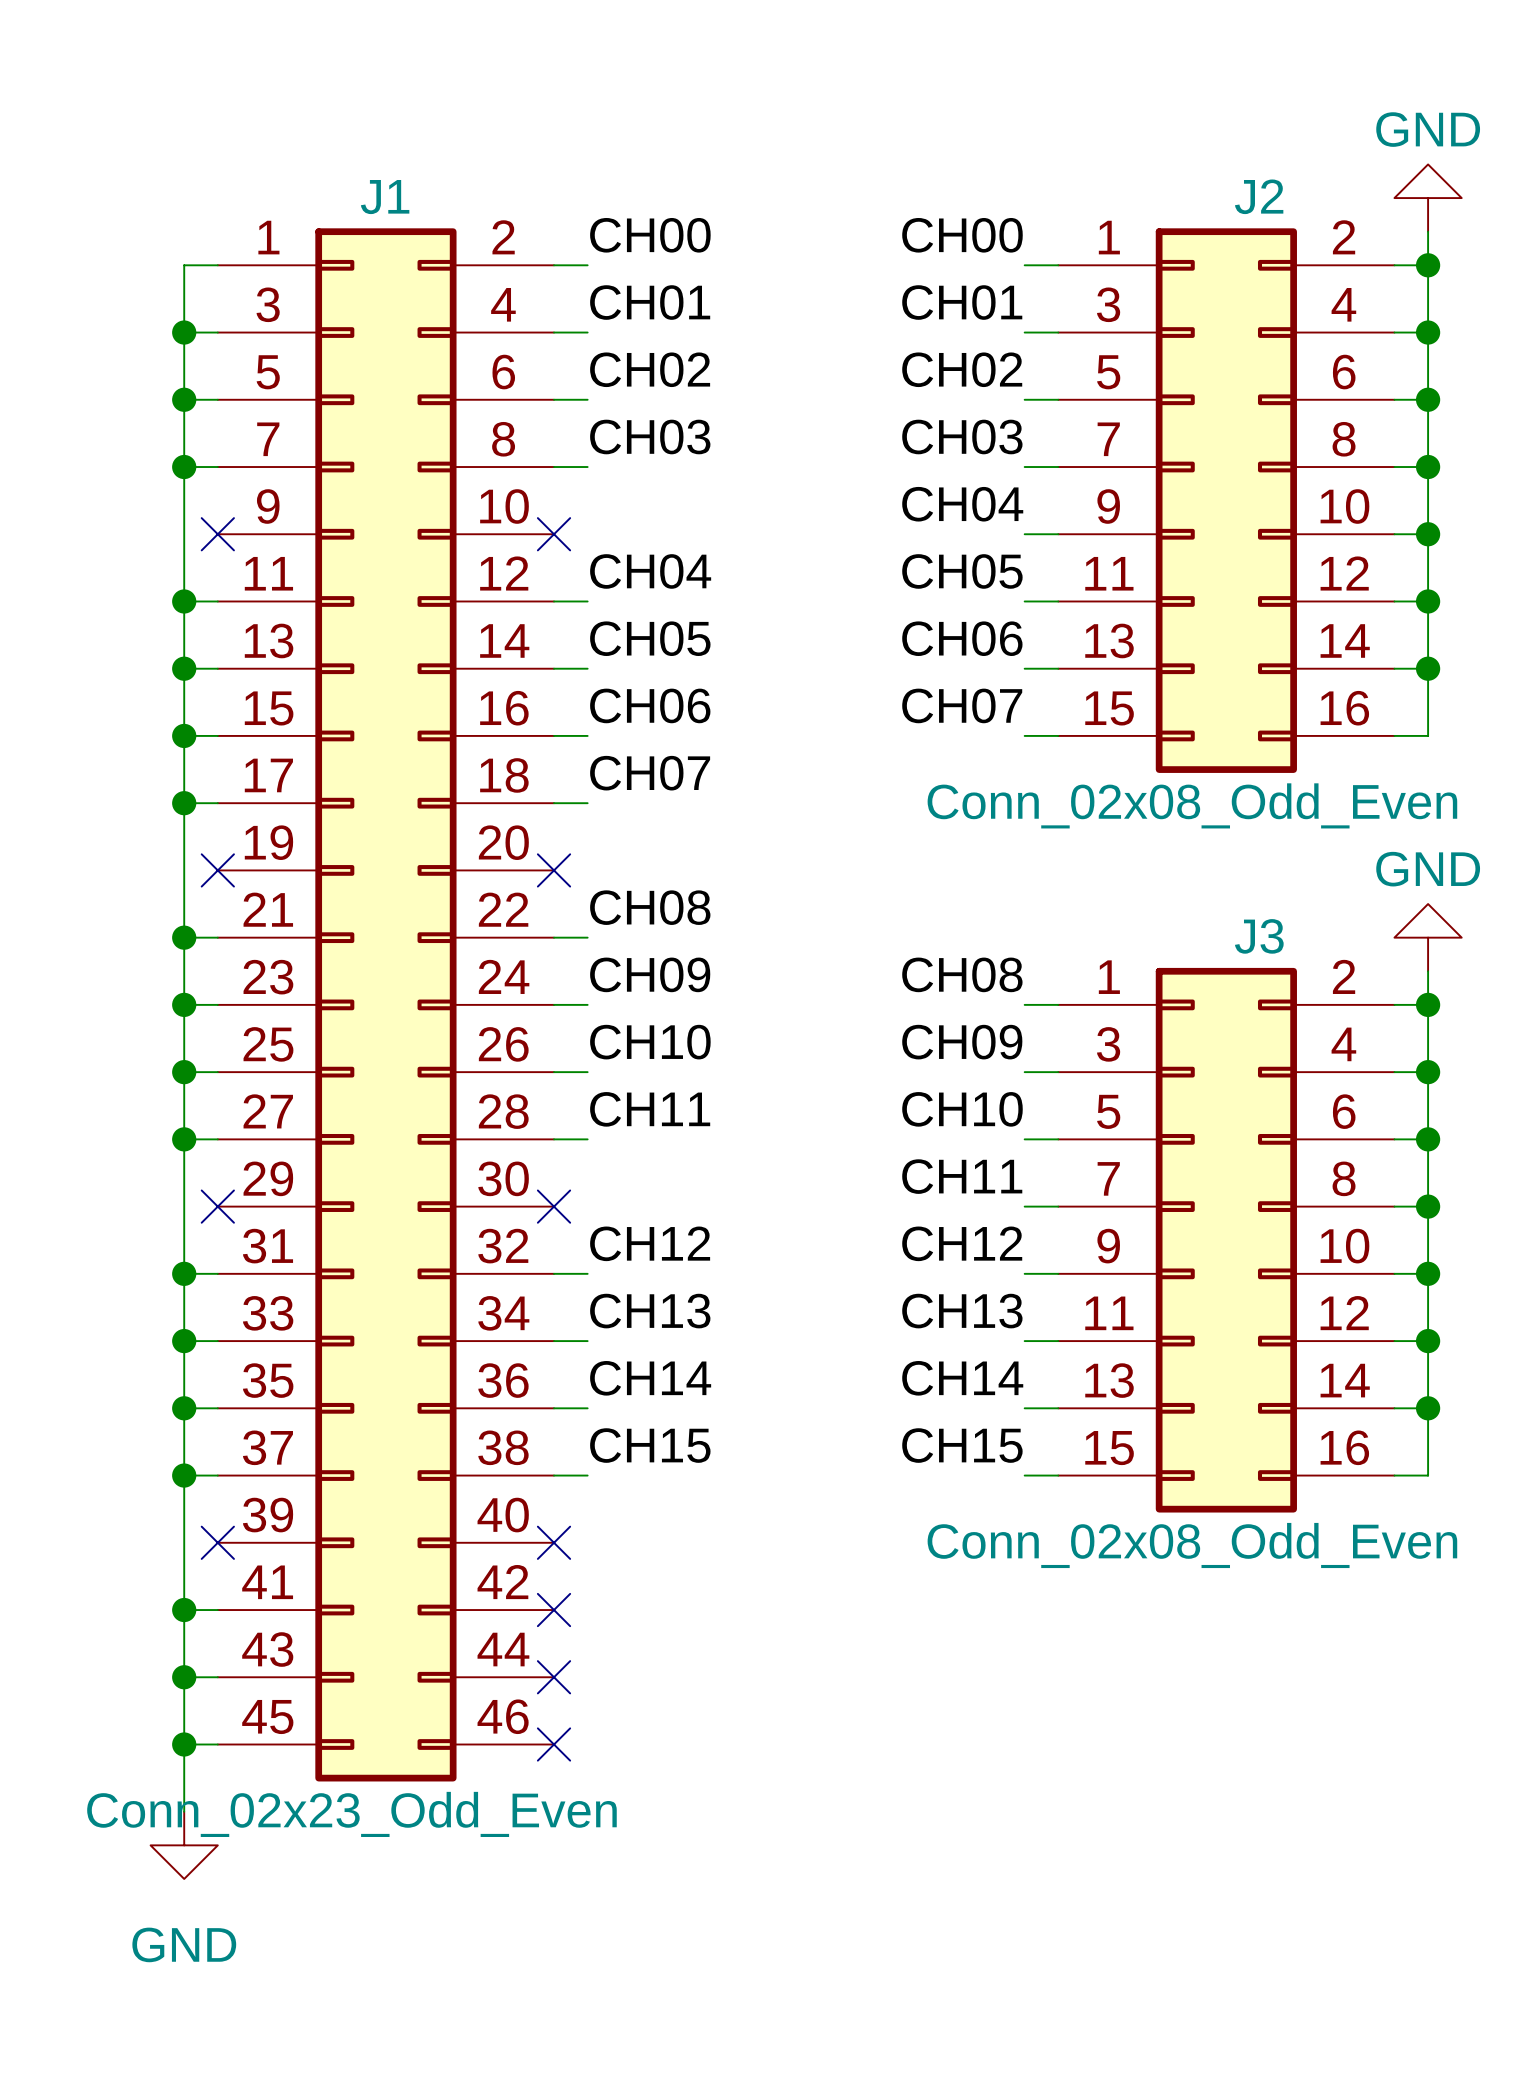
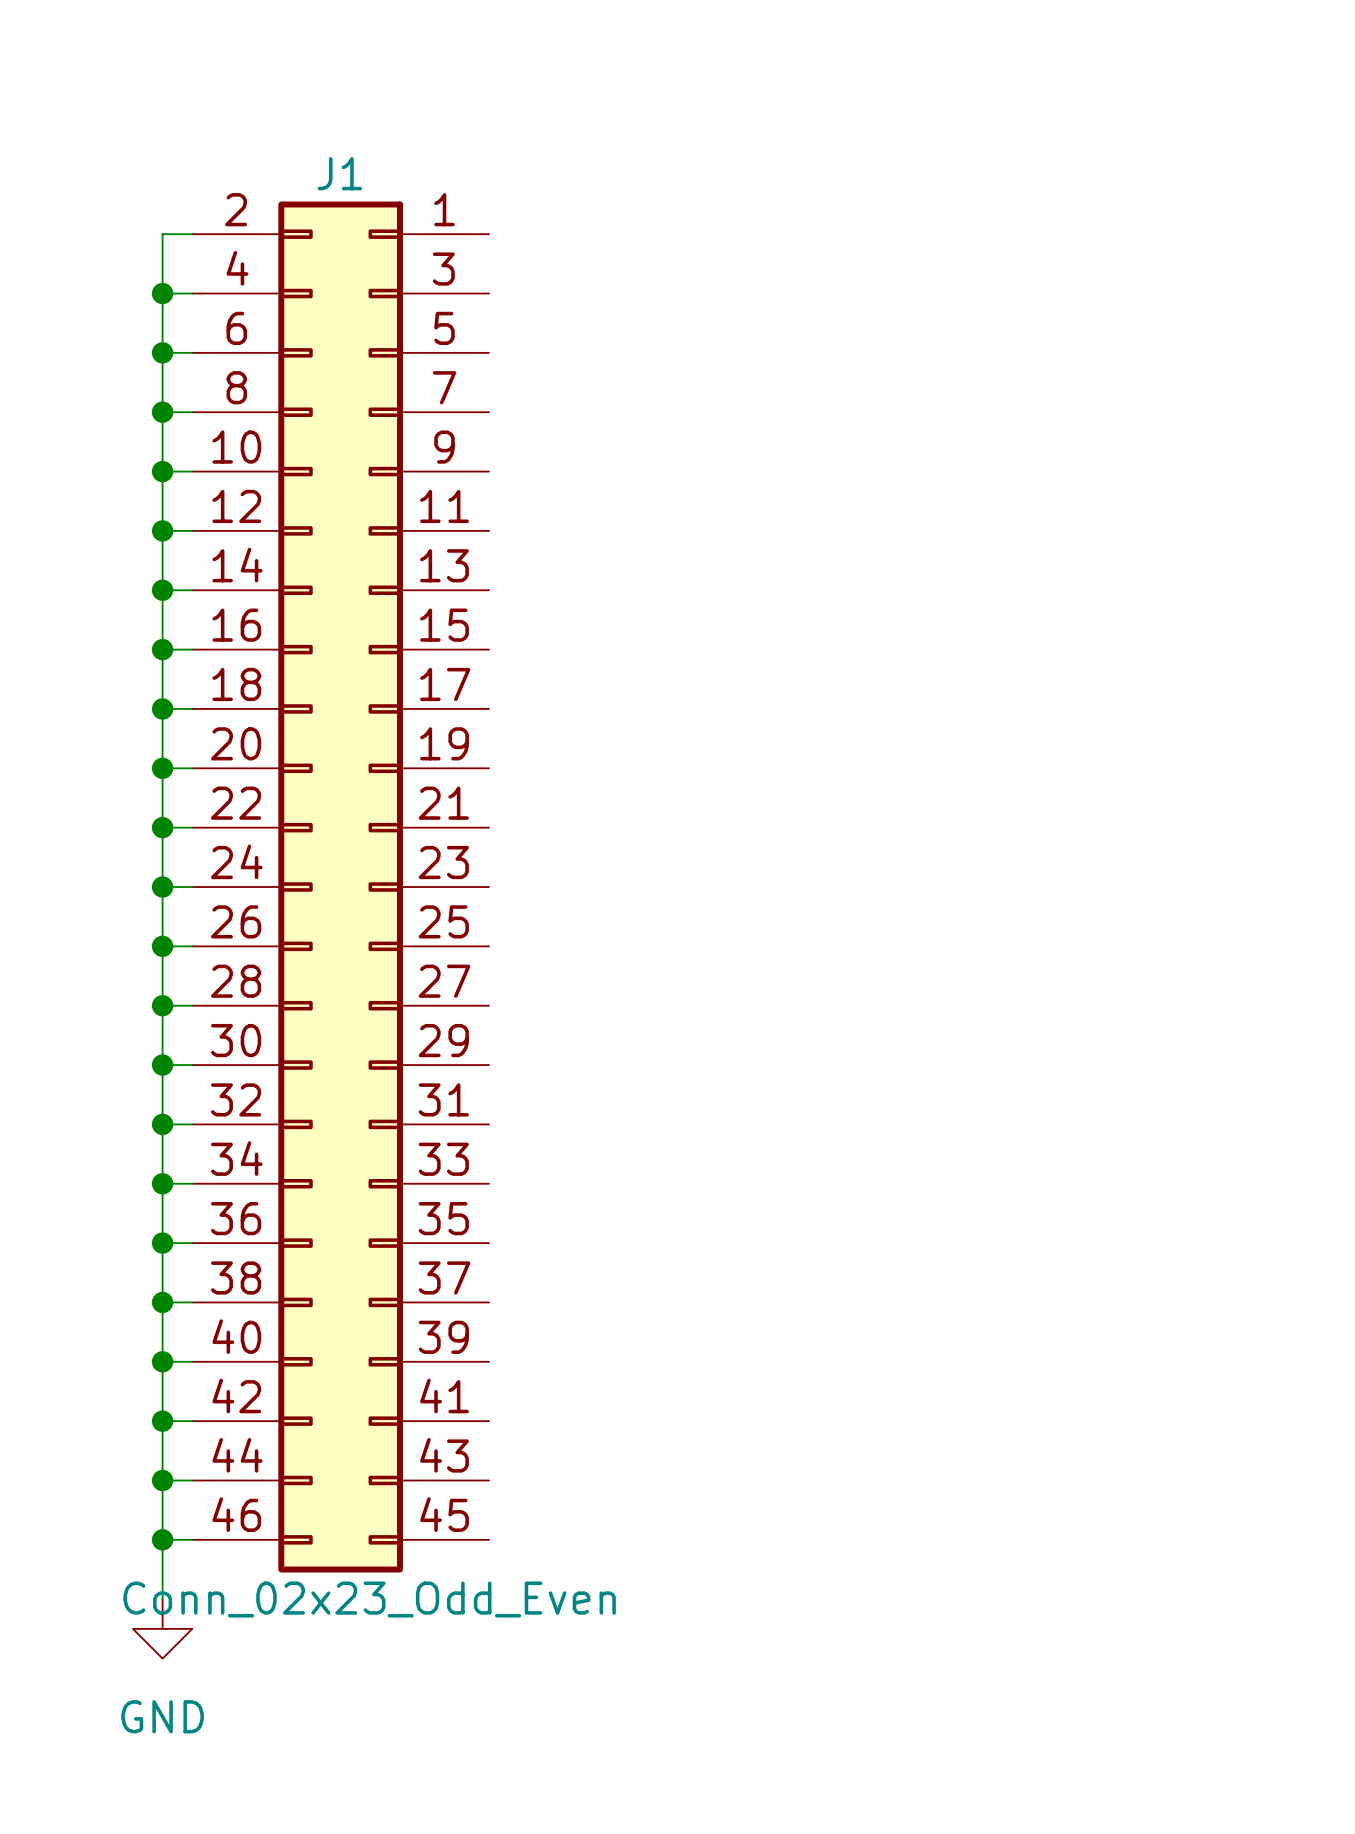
power symbol: GND (1428, 198) -> none
wire: (1428, 231) (1428, 735) (1394, 735) -> none
label: CH00 (650, 235) -> none
label: CH00 (962, 235) -> none
wire: (554, 265) (587, 265) -> none
wire: (1024, 265) (1058, 265) -> none
wire: (1394, 265) (1428, 265) -> none
junction: (1428, 265) -> none
label: CH01 (650, 302) -> none
label: CH01 (962, 302) -> none
wire: (554, 332) (587, 332) -> none
wire: (1024, 332) (1058, 332) -> none
wire: (1394, 332) (1428, 332) -> none
junction: (1428, 332) -> none
label: CH02 (650, 369) -> none
label: CH02 (962, 369) -> none
wire: (554, 399) (587, 399) -> none
wire: (1024, 399) (1058, 399) -> none
wire: (1394, 399) (1428, 399) -> none
junction: (1428, 399) -> none
label: CH03 (650, 436) -> none
label: CH03 (962, 436) -> none
wire: (554, 467) (587, 467) -> (162, 471) (192, 471)
wire: (1024, 467) (1058, 467) -> none
wire: (1394, 467) (1428, 467) -> none
junction: (1428, 467) -> none
J2: Conn_02x08_Odd_Even (1226, 500) -> none
label: CH04 (962, 504) -> none
junction: none -> (162, 471)
no-connect mark: (217, 534) -> none
no-connect mark: (554, 534) -> none
wire: (1024, 534) (1058, 534) -> none
wire: (1394, 534) (1428, 534) -> none
junction: (1428, 534) -> none
label: CH04 (650, 571) -> none
label: CH05 (962, 571) -> none
wire: (554, 601) (587, 601) -> none
wire: (1024, 601) (1058, 601) -> none
wire: (1394, 601) (1428, 601) -> none
junction: (1428, 601) -> none
label: CH05 (650, 638) -> none
label: CH06 (962, 638) -> none
wire: (554, 668) (587, 668) -> none
wire: (1024, 668) (1058, 668) -> none
wire: (1394, 668) (1428, 668) -> none
junction: (1428, 668) -> none
label: CH06 (650, 705) -> none
label: CH07 (962, 705) -> none
wire: (554, 735) (587, 735) -> none
wire: (1024, 735) (1058, 735) -> none
label: CH07 (650, 773) -> none
wire: (554, 803) (587, 803) -> (162, 768) (192, 768)
junction: none -> (162, 768)
no-connect mark: (217, 870) -> none
no-connect mark: (554, 870) -> none
label: CH08 (650, 907) -> none
wire: (554, 937) (587, 937) -> none
power symbol: GND (1428, 937) -> none
wire: (1428, 971) (1428, 1475) (1394, 1475) -> none
label: CH09 (650, 974) -> none
label: CH08 (962, 974) -> none
J1 flip: as is (385, 1004) -> left-right (340, 887)
wire: (554, 1004) (587, 1004) -> none
wire: (1024, 1004) (1058, 1004) -> none
wire: (1394, 1004) (1428, 1004) -> none
junction: (1428, 1004) -> none
label: CH10 (650, 1042) -> none
label: CH09 (962, 1042) -> none
wire: (554, 1072) (587, 1072) -> none
wire: (1024, 1072) (1058, 1072) -> none
wire: (1394, 1072) (1428, 1072) -> none
junction: (1428, 1072) -> none
label: CH11 (650, 1109) -> none
label: CH10 (962, 1109) -> none
wire: (554, 1139) (587, 1139) -> (162, 1065) (192, 1065)
wire: (1024, 1139) (1058, 1139) -> none
wire: (1394, 1139) (1428, 1139) -> none
junction: (1428, 1139) -> none
label: CH11 (962, 1176) -> none
junction: none -> (162, 1065)
no-connect mark: (217, 1206) -> none
no-connect mark: (554, 1206) -> none
wire: (1024, 1206) (1058, 1206) -> none
wire: (1394, 1206) (1428, 1206) -> none
junction: (1428, 1206) -> none
J3: Conn_02x08_Odd_Even (1226, 1240) -> none
label: CH12 (650, 1243) -> none
label: CH12 (962, 1243) -> none
wire: (554, 1273) (587, 1273) -> none
wire: (1024, 1273) (1058, 1273) -> none
wire: (1394, 1273) (1428, 1273) -> none
junction: (1428, 1273) -> none
label: CH13 (650, 1311) -> none
label: CH13 (962, 1311) -> none
wire: (554, 1341) (587, 1341) -> none
wire: (1024, 1341) (1058, 1341) -> none
wire: (1394, 1341) (1428, 1341) -> none
junction: (1428, 1341) -> none
label: CH14 (650, 1378) -> none
label: CH14 (962, 1378) -> none
wire: (554, 1408) (587, 1408) -> none
wire: (1024, 1408) (1058, 1408) -> none
wire: (1394, 1408) (1428, 1408) -> none
junction: (1428, 1408) -> none
label: CH15 (650, 1445) -> none
label: CH15 (962, 1445) -> none
wire: (554, 1475) (587, 1475) -> (162, 1361) (192, 1361)
wire: (1024, 1475) (1058, 1475) -> none
junction: none -> (162, 1361)
no-connect mark: (217, 1542) -> none
no-connect mark: (554, 1542) -> none
no-connect mark: (554, 1610) -> none
no-connect mark: (554, 1677) -> none
no-connect mark: (554, 1744) -> none

